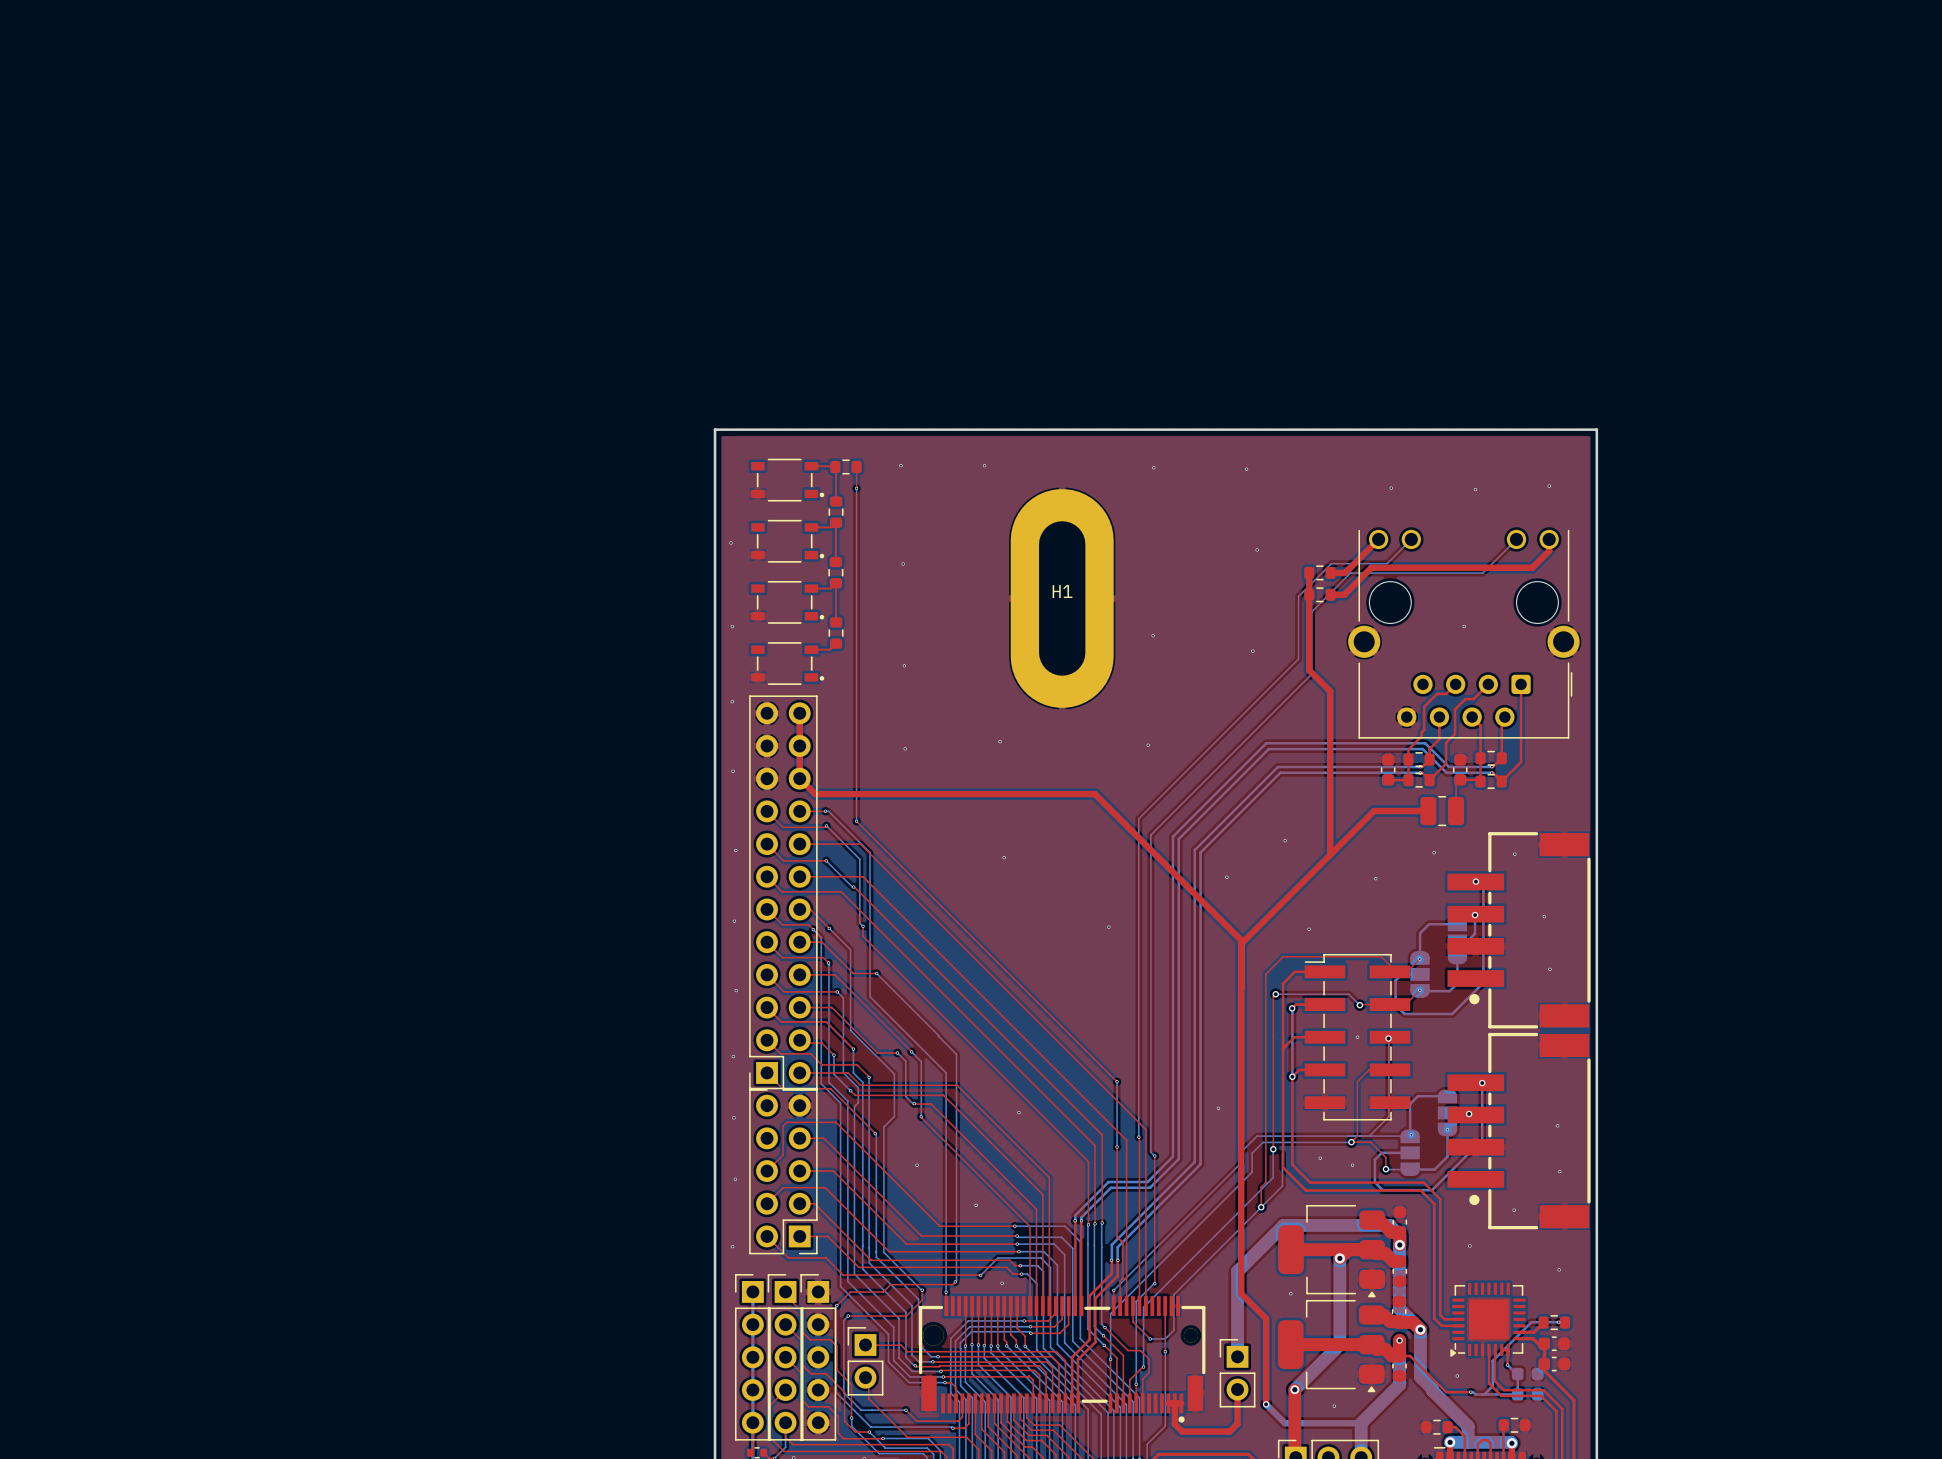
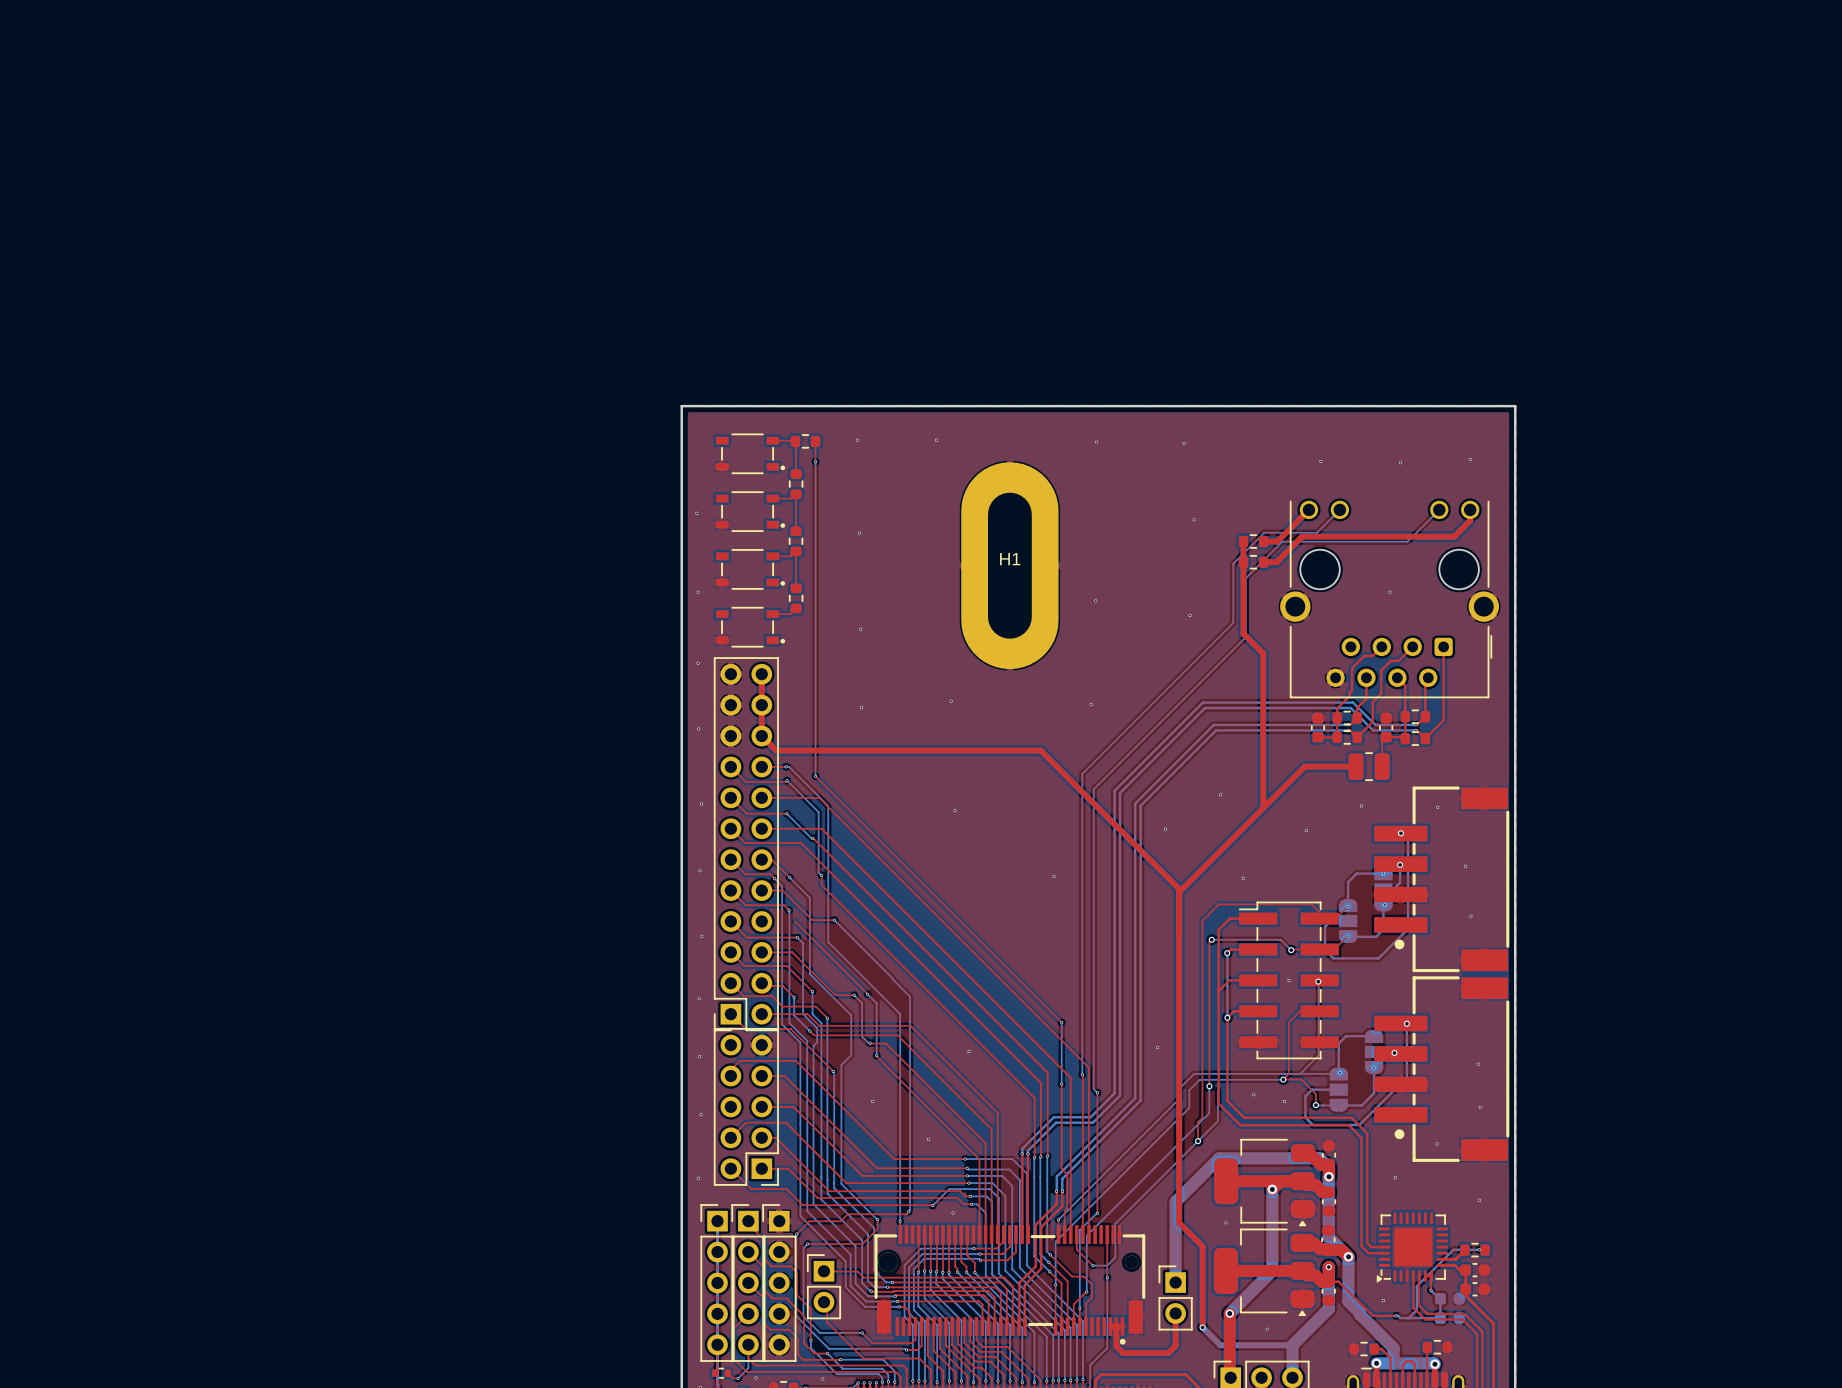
via: none -> (1383, 873)
via: none -> (1384, 904)
top track: (799, 974) (834, 974) -> none
top track: (786, 1122) (783, 1126) (783, 1154) (767, 1171) -> (749, 1060) (739, 1060) (732, 1067)

